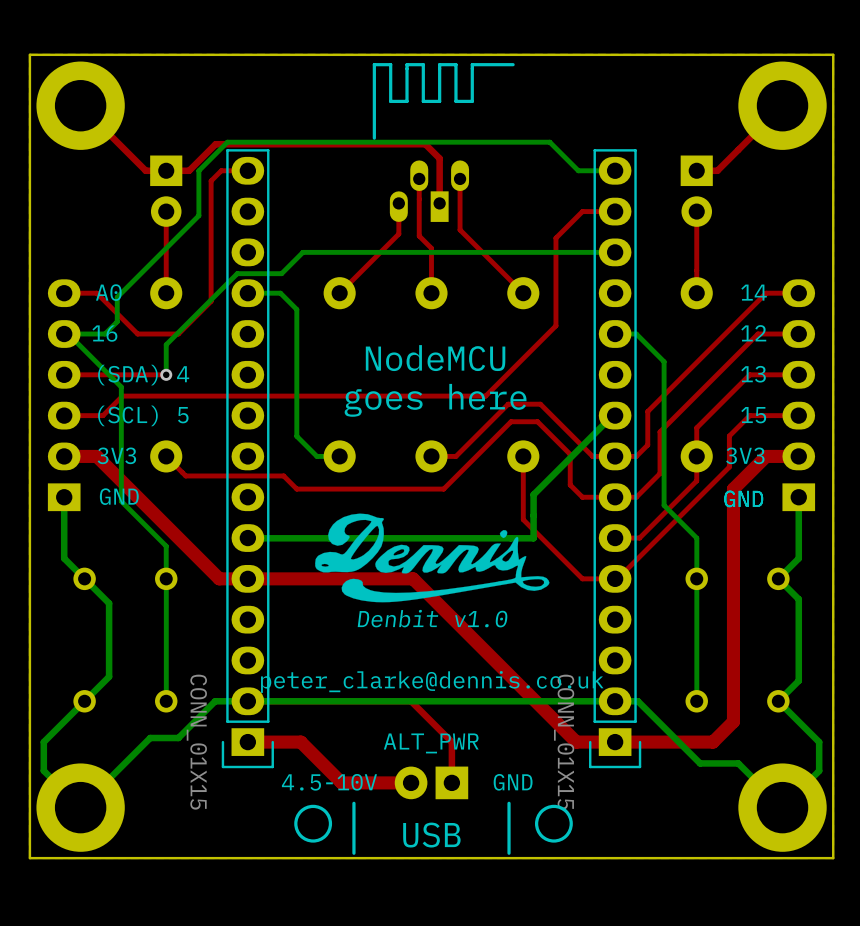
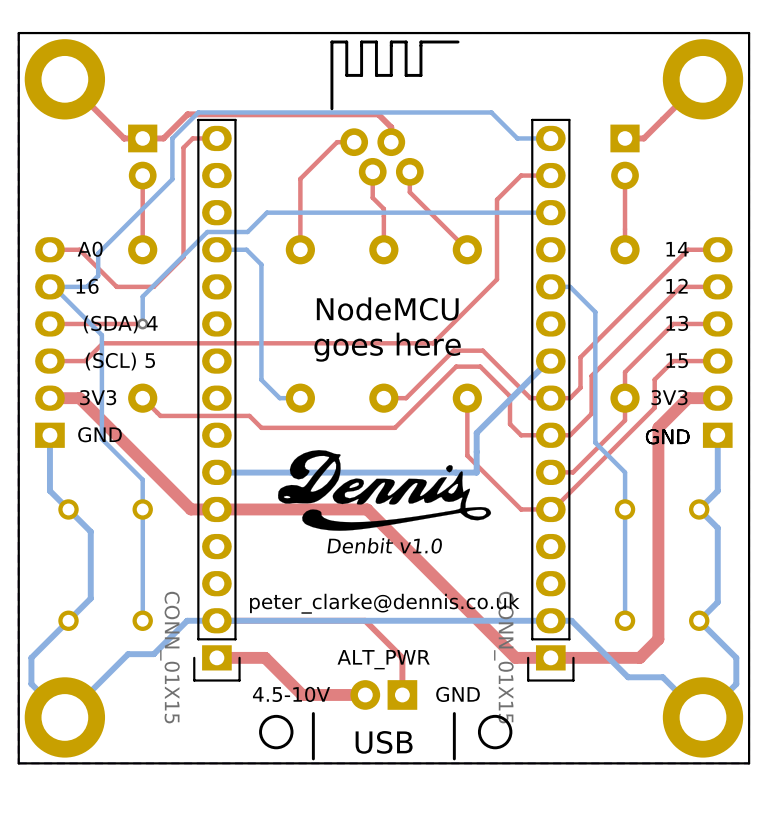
part footprint: [389, 160, 470, 222] -> [340, 128, 424, 186]
top track: (439, 174) (439, 203) -> none
top track: (419, 178) (419, 207) -> none
top track: (460, 178) (460, 207) -> none
top track: (398, 203) (398, 234) (339, 293) -> (354, 142) (337, 142) (300, 178) (300, 249)

